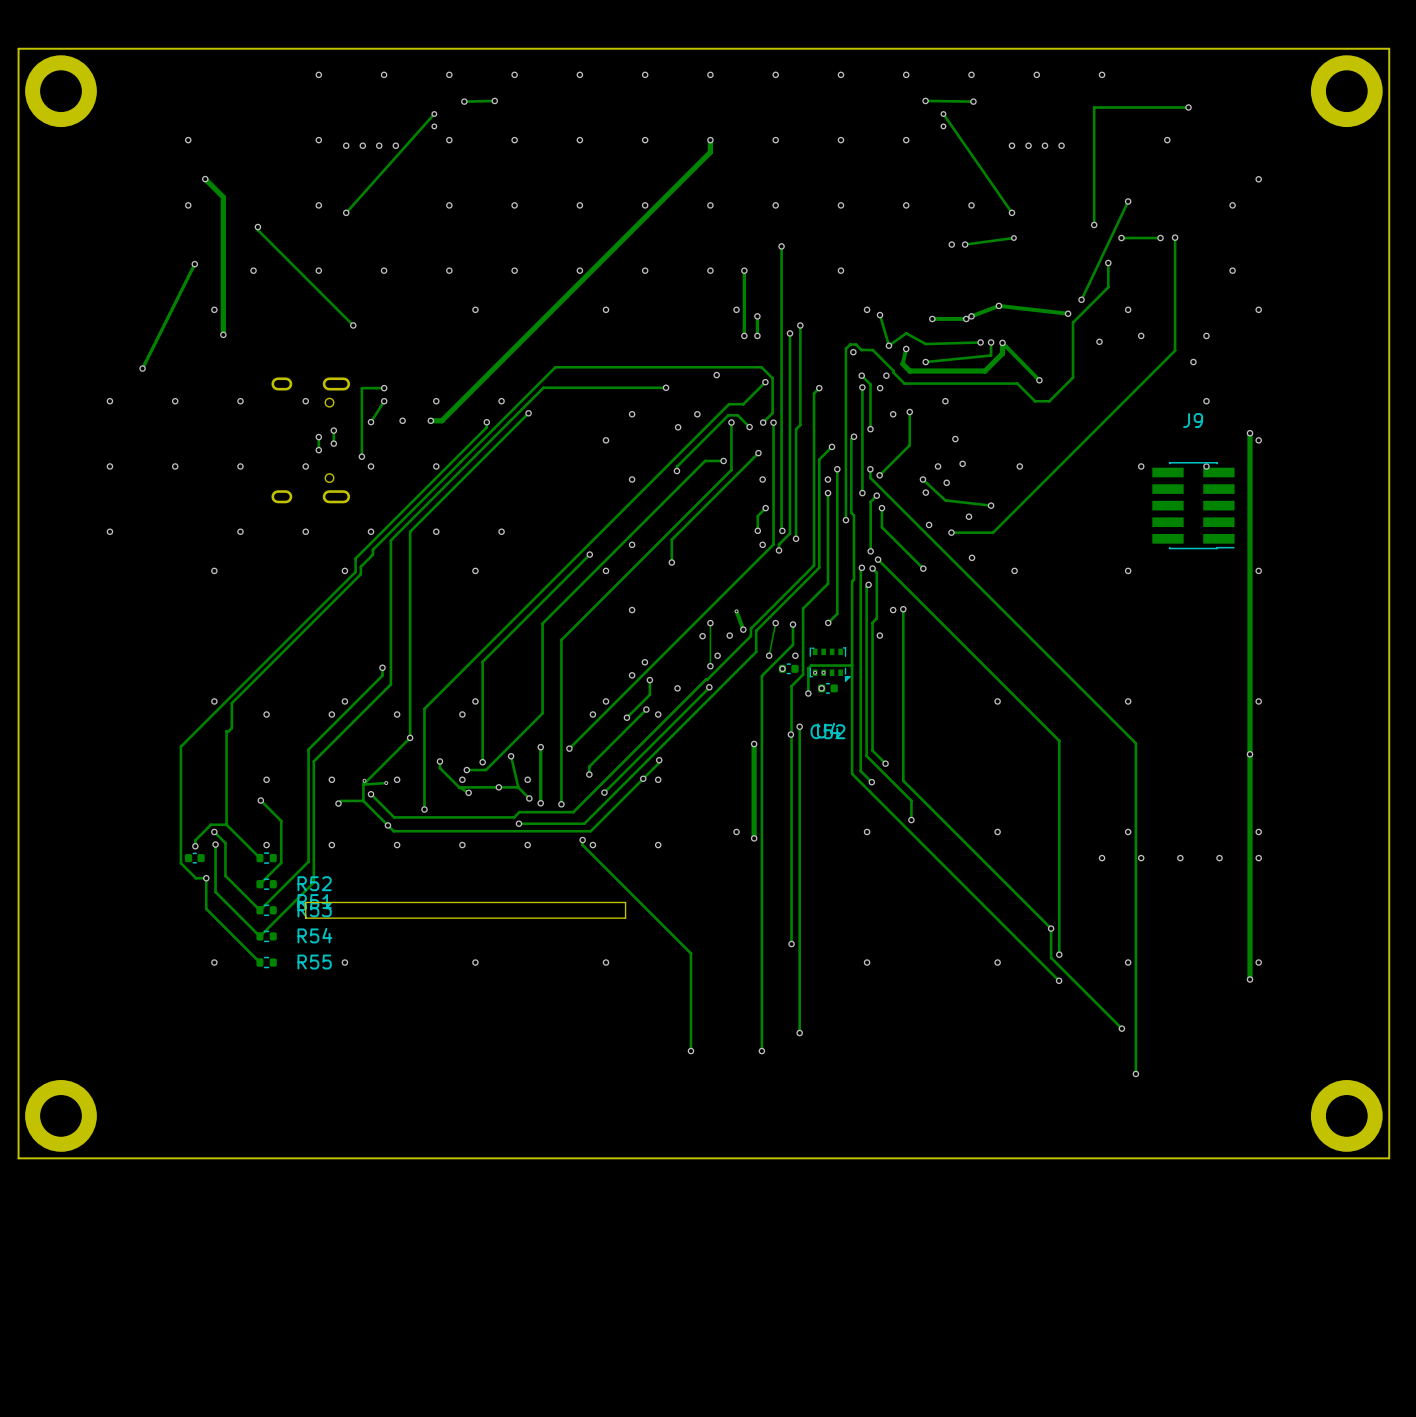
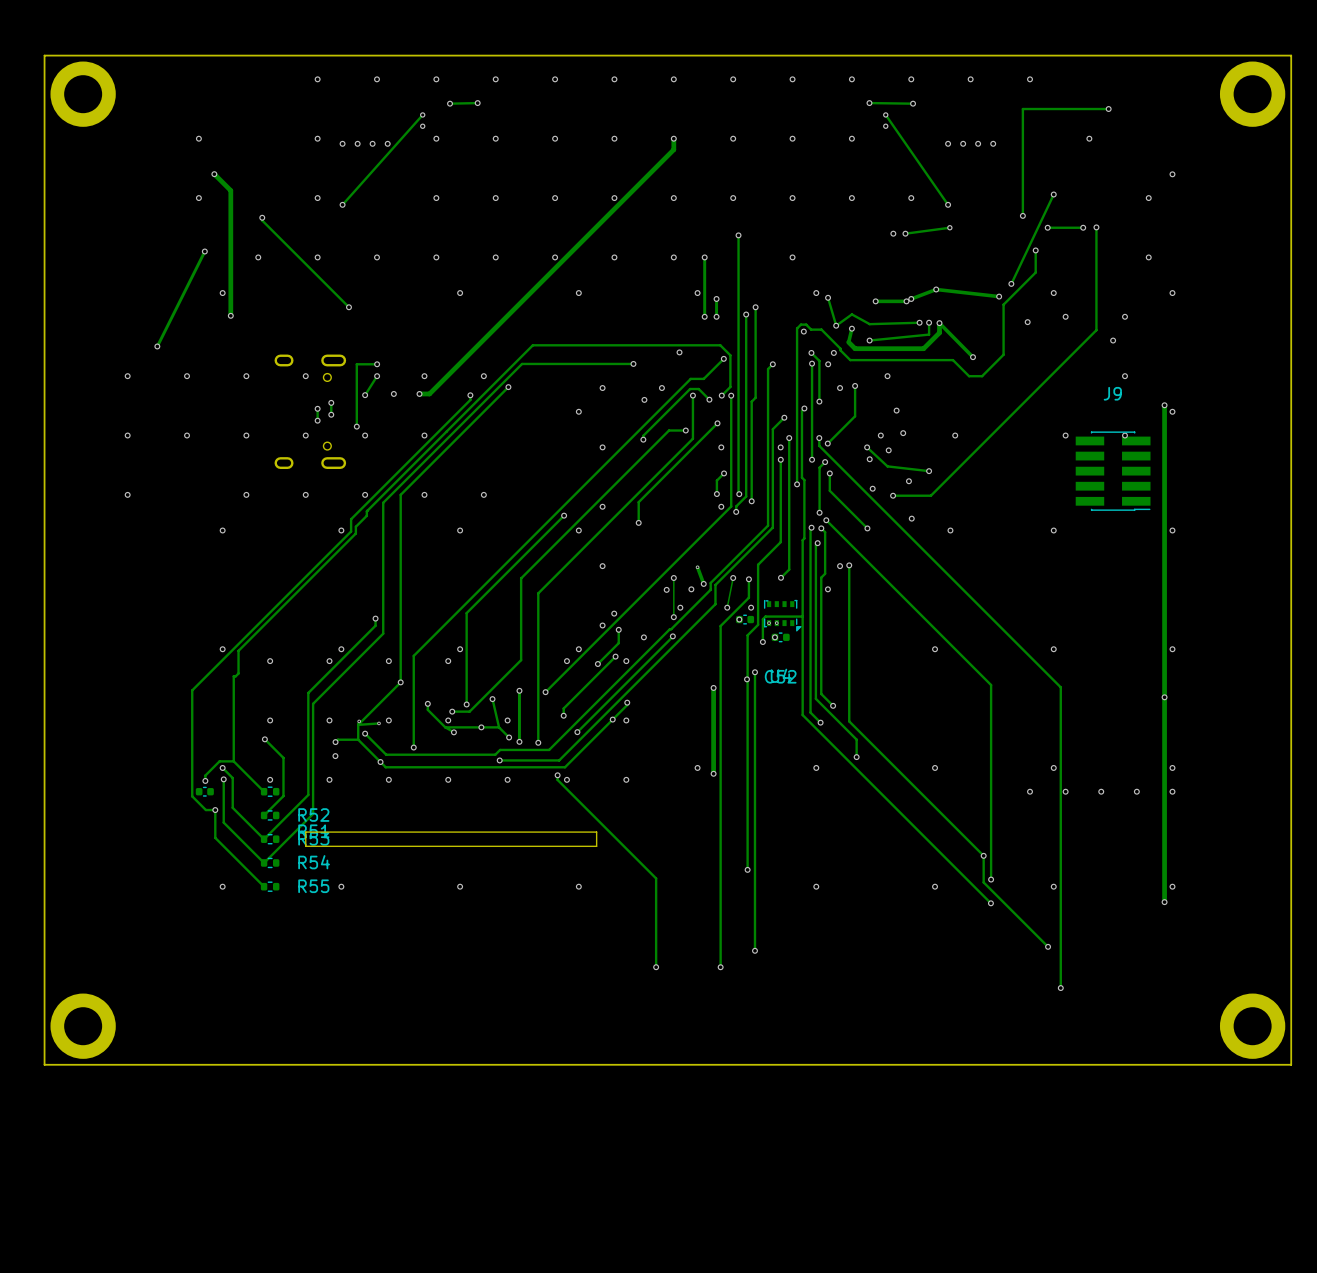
via: none -> (335, 756)

